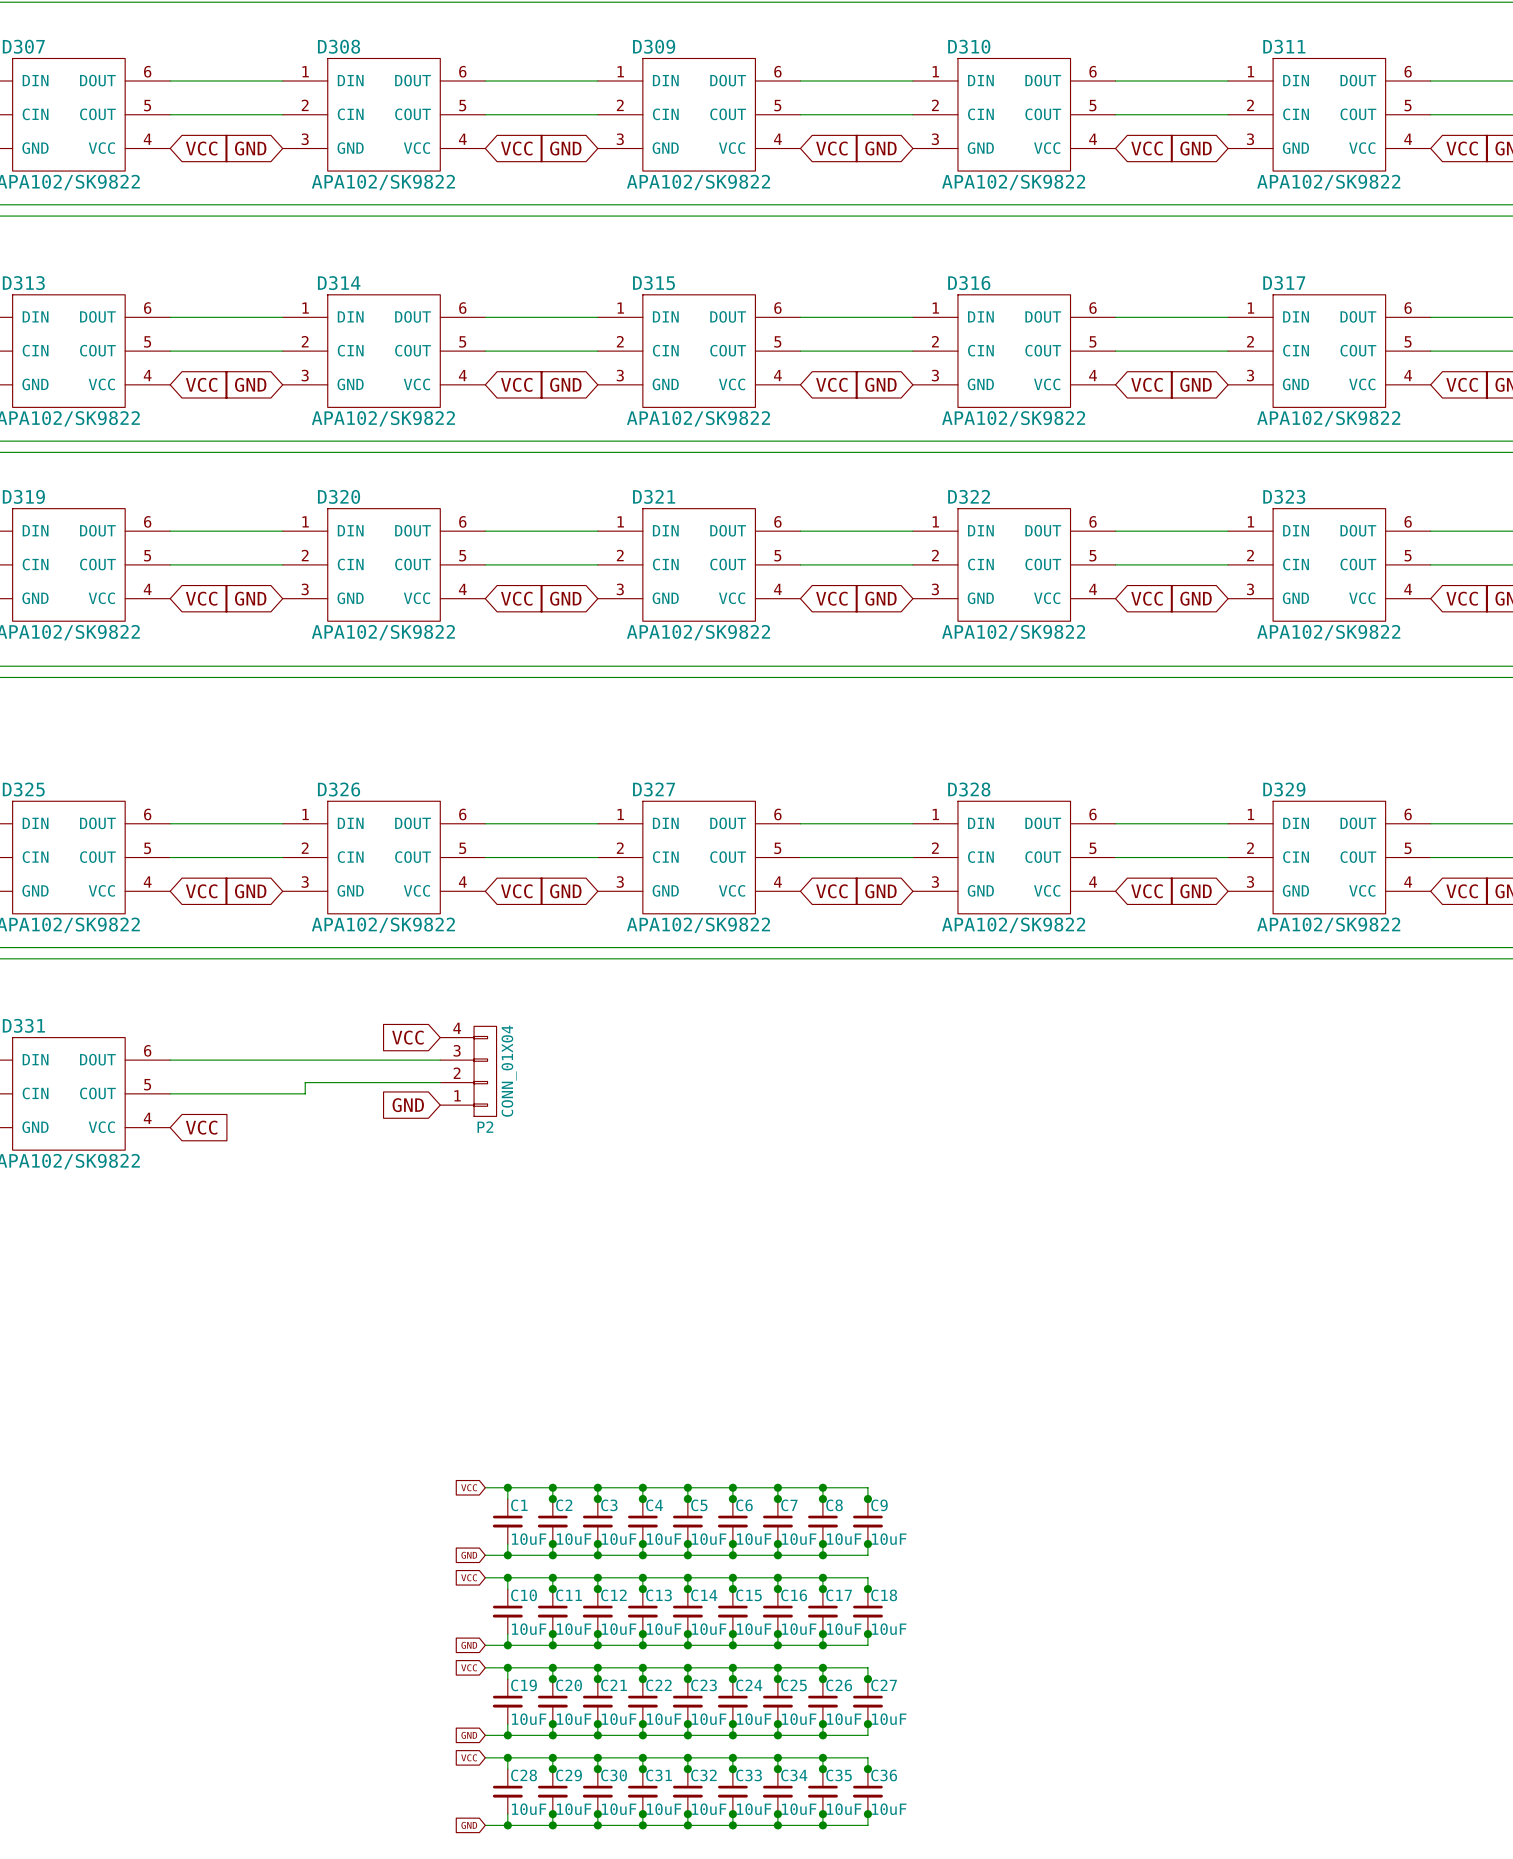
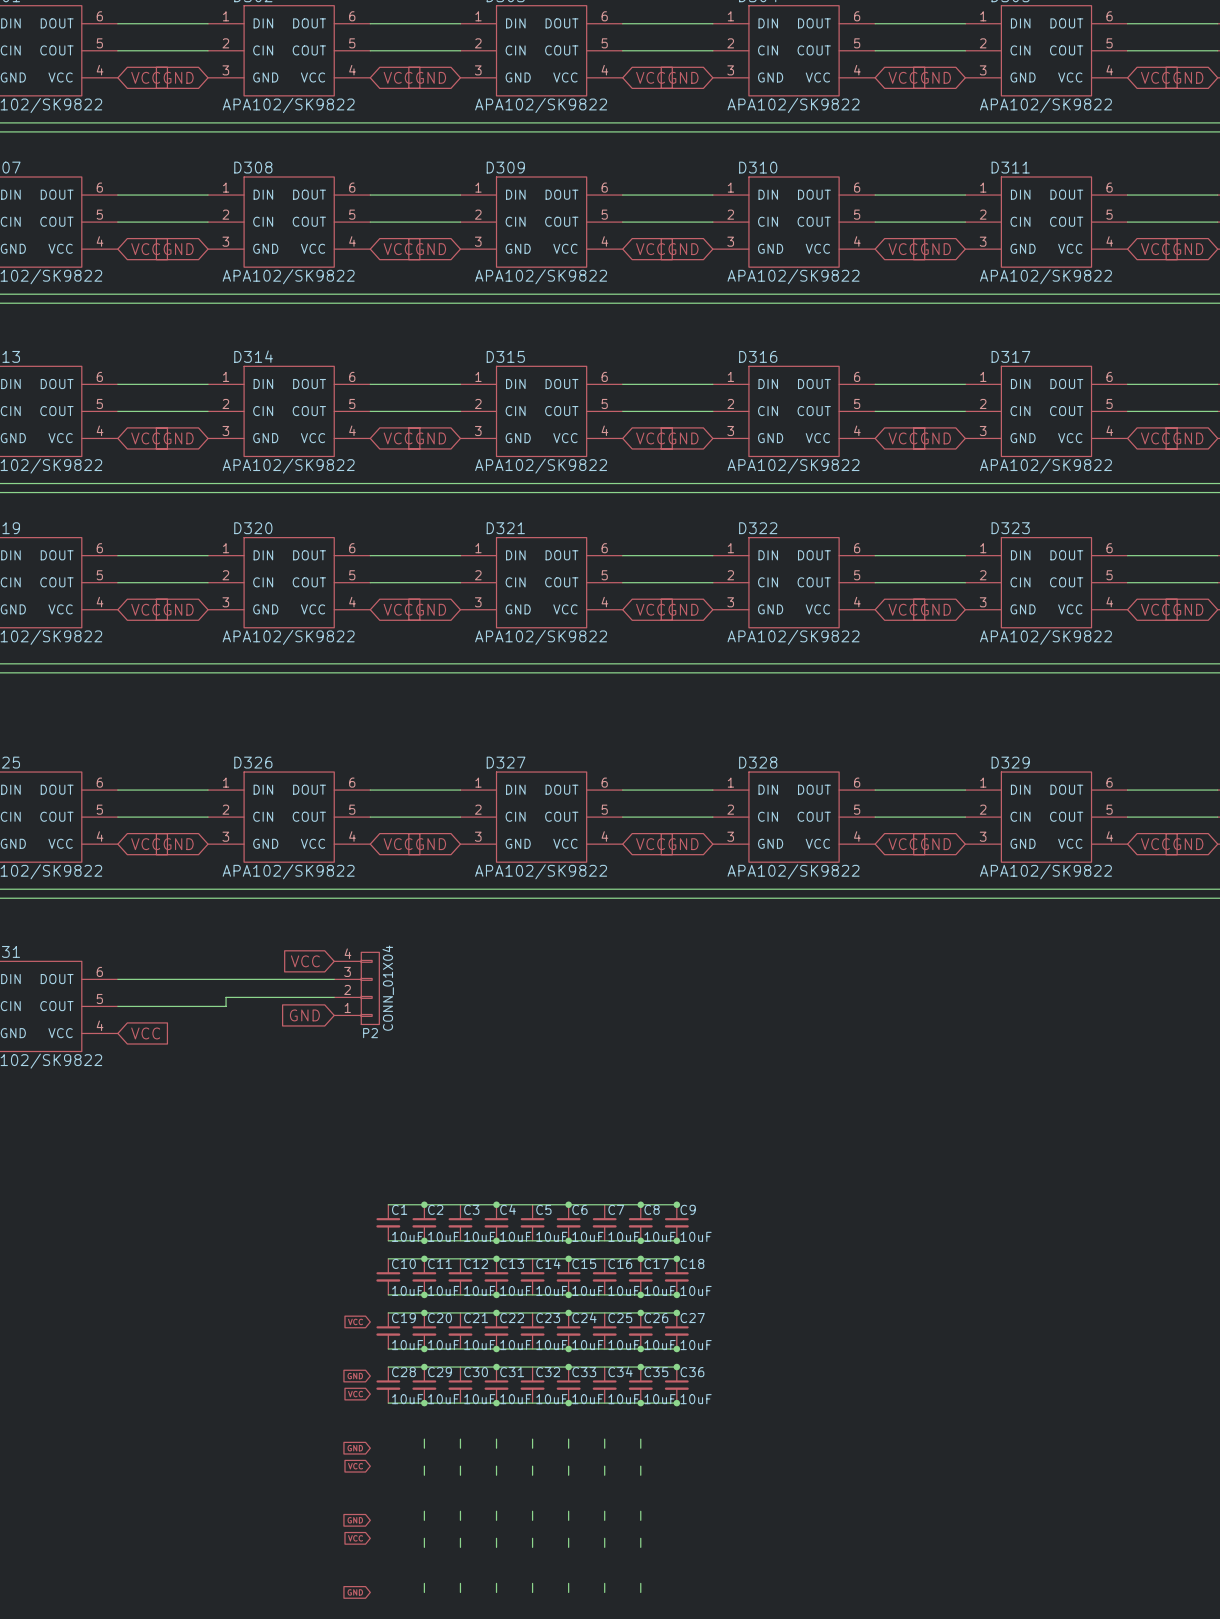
wire: none -> (388, 1204) (676, 1204)
junction: none -> (424, 1204)
junction: none -> (496, 1204)
junction: none -> (568, 1204)
junction: none -> (640, 1204)
junction: none -> (676, 1204)
wire: none -> (388, 1240) (676, 1240)
junction: none -> (424, 1240)
junction: none -> (496, 1240)
junction: none -> (568, 1240)
junction: none -> (640, 1240)
junction: none -> (676, 1240)
wire: none -> (388, 1258) (676, 1258)
junction: none -> (424, 1258)
junction: none -> (496, 1258)
junction: none -> (568, 1258)
junction: none -> (640, 1258)
junction: none -> (676, 1258)
wire: none -> (388, 1294) (676, 1294)
junction: none -> (424, 1294)
junction: none -> (496, 1294)
junction: none -> (568, 1294)
junction: none -> (640, 1294)
junction: none -> (676, 1294)
wire: none -> (388, 1312) (676, 1312)
junction: none -> (424, 1312)
junction: none -> (496, 1312)
junction: none -> (568, 1312)
junction: none -> (640, 1312)
junction: none -> (676, 1312)
wire: (485, 1487) (867, 1487) (867, 1499) -> none
junction: (507, 1487) -> none
junction: (552, 1487) -> none
junction: (597, 1487) -> none
junction: (642, 1487) -> none
junction: (687, 1487) -> none
junction: (732, 1487) -> none
junction: (777, 1487) -> none
junction: (822, 1487) -> none
junction: (552, 1499) -> none
junction: (597, 1499) -> none
junction: (642, 1499) -> none
junction: (687, 1499) -> none
junction: (732, 1499) -> none
junction: (777, 1499) -> none
junction: (822, 1499) -> none
junction: (867, 1499) -> none
wire: none -> (388, 1349) (676, 1349)
C1 position: (507, 1521) -> (388, 1222)
C2 position: (552, 1521) -> (424, 1222)
junction: none -> (424, 1349)
C3 position: (597, 1521) -> (460, 1222)
C4 position: (642, 1521) -> (496, 1222)
junction: none -> (496, 1349)
C5 position: (687, 1521) -> (532, 1222)
C6 position: (732, 1521) -> (568, 1222)
junction: none -> (568, 1349)
C7 position: (777, 1521) -> (604, 1222)
C8 position: (822, 1521) -> (640, 1222)
junction: none -> (640, 1349)
C9 position: (867, 1521) -> (676, 1222)
junction: none -> (676, 1349)
junction: (597, 1544) -> none
junction: (687, 1544) -> none
junction: (777, 1544) -> none
wire: (867, 1544) (867, 1555) (485, 1555) -> (676, 1367) (388, 1367)
junction: (507, 1555) -> none
junction: (552, 1555) -> none
junction: (597, 1555) -> none
junction: (642, 1555) -> none
junction: (687, 1555) -> none
junction: (732, 1555) -> none
junction: (777, 1555) -> none
junction: (822, 1555) -> none
wire: (485, 1577) (867, 1577) (867, 1589) -> (388, 1403) (676, 1403)
junction: (507, 1577) -> none
junction: (552, 1577) -> none
junction: (597, 1577) -> none
junction: (642, 1577) -> none
junction: (687, 1577) -> none
junction: (732, 1577) -> none
junction: (777, 1577) -> none
junction: (822, 1577) -> none
junction: (597, 1589) -> none
junction: (687, 1589) -> none
junction: (777, 1589) -> none
C10 position: (507, 1611) -> (388, 1276)
C11 position: (552, 1611) -> (424, 1276)
C12 position: (597, 1611) -> (460, 1276)
C13 position: (642, 1611) -> (496, 1276)
C14 position: (687, 1611) -> (532, 1276)
C15 position: (732, 1611) -> (568, 1276)
C16 position: (777, 1611) -> (604, 1276)
C17 position: (822, 1611) -> (640, 1276)
C18 position: (867, 1611) -> (676, 1276)
wire: (507, 1634) (507, 1645) -> none
junction: (552, 1634) -> none
junction: (597, 1634) -> none
junction: (642, 1634) -> none
junction: (687, 1634) -> none
junction: (732, 1634) -> none
junction: (777, 1634) -> none
junction: (822, 1634) -> none
wire: (867, 1634) (867, 1645) (485, 1645) -> none
junction: (867, 1634) -> none
junction: (507, 1645) -> none
junction: (552, 1645) -> none
junction: (597, 1645) -> none
junction: (642, 1645) -> none
junction: (687, 1645) -> none
junction: (732, 1645) -> none
junction: (777, 1645) -> none
junction: (822, 1645) -> none
wire: (485, 1667) (867, 1667) (867, 1679) -> none
wire: (507, 1667) (507, 1679) -> none
junction: (507, 1667) -> none
junction: (552, 1667) -> none
junction: (597, 1667) -> none
junction: (642, 1667) -> none
junction: (687, 1667) -> none
junction: (732, 1667) -> none
junction: (777, 1667) -> none
junction: (822, 1667) -> none
junction: (552, 1679) -> none
junction: (597, 1679) -> none
junction: (642, 1679) -> none
junction: (687, 1679) -> none
junction: (732, 1679) -> none
junction: (777, 1679) -> none
junction: (822, 1679) -> none
junction: (867, 1679) -> none
C19 position: (507, 1701) -> (388, 1330)
C20 position: (552, 1701) -> (424, 1330)
C21 position: (597, 1701) -> (460, 1330)
C22 position: (642, 1701) -> (496, 1330)
C23 position: (687, 1701) -> (532, 1330)
C24 position: (732, 1701) -> (568, 1330)
C25 position: (777, 1701) -> (604, 1330)
C26 position: (822, 1701) -> (640, 1330)
C27 position: (867, 1701) -> (676, 1330)
wire: (507, 1724) (507, 1735) -> none
junction: (552, 1724) -> none
junction: (597, 1724) -> none
junction: (642, 1724) -> none
junction: (687, 1724) -> none
junction: (732, 1724) -> none
junction: (777, 1724) -> none
junction: (822, 1724) -> none
wire: (867, 1724) (867, 1735) (485, 1735) -> none
junction: (867, 1724) -> none
junction: (507, 1735) -> none
junction: (552, 1735) -> none
junction: (597, 1735) -> none
junction: (642, 1735) -> none
junction: (687, 1735) -> none
junction: (732, 1735) -> none
junction: (777, 1735) -> none
junction: (822, 1735) -> none
wire: (485, 1757) (867, 1757) (867, 1769) -> none
wire: (507, 1757) (507, 1769) -> none
junction: (507, 1757) -> none
junction: (552, 1757) -> none
junction: (597, 1757) -> none
junction: (642, 1757) -> none
junction: (687, 1757) -> none
junction: (732, 1757) -> none
junction: (777, 1757) -> none
junction: (822, 1757) -> none
junction: (552, 1769) -> none
junction: (597, 1769) -> none
junction: (642, 1769) -> none
junction: (687, 1769) -> none
junction: (732, 1769) -> none
junction: (777, 1769) -> none
junction: (822, 1769) -> none
junction: (867, 1769) -> none
C28 position: (507, 1791) -> (388, 1385)
C29 position: (552, 1791) -> (424, 1385)
C30 position: (597, 1791) -> (460, 1385)
C31 position: (642, 1791) -> (496, 1385)
C32 position: (687, 1791) -> (532, 1385)
C33 position: (732, 1791) -> (568, 1385)
C34 position: (777, 1791) -> (604, 1385)
C35 position: (822, 1791) -> (640, 1385)
C36 position: (867, 1791) -> (676, 1385)
wire: (507, 1814) (507, 1825) -> none
junction: (552, 1814) -> none
junction: (597, 1814) -> none
junction: (642, 1814) -> none
junction: (687, 1814) -> none
junction: (732, 1814) -> none
junction: (777, 1814) -> none
junction: (822, 1814) -> none
wire: (867, 1814) (867, 1825) (485, 1825) -> none
junction: (867, 1814) -> none
junction: (507, 1825) -> none
junction: (552, 1825) -> none
junction: (597, 1825) -> none
junction: (642, 1825) -> none
junction: (687, 1825) -> none
junction: (732, 1825) -> none
junction: (777, 1825) -> none
junction: (822, 1825) -> none

